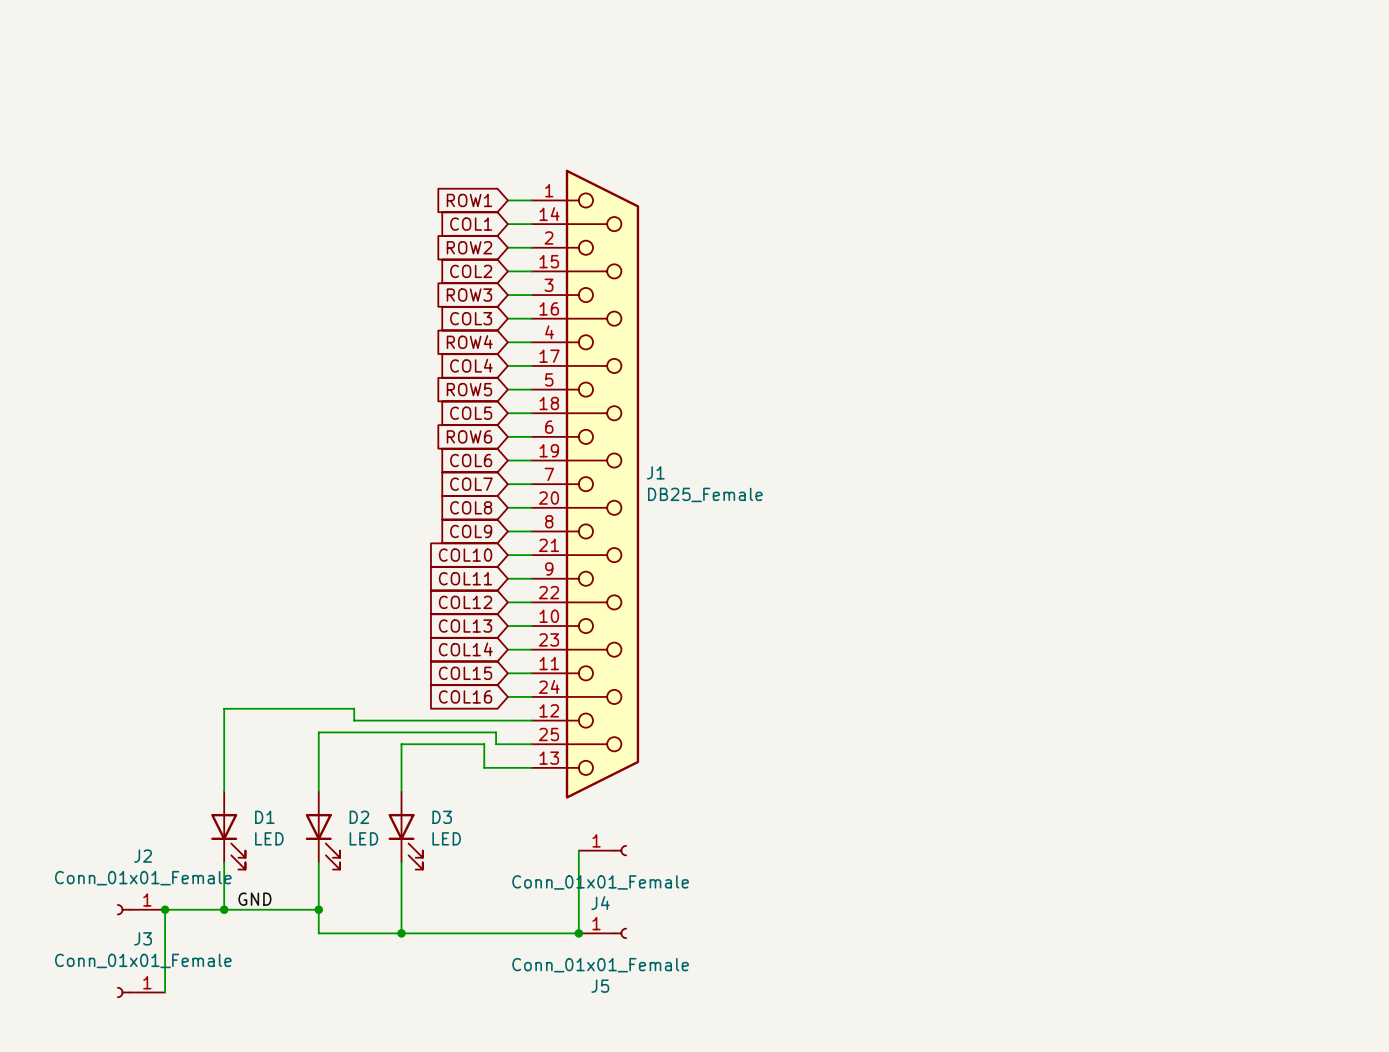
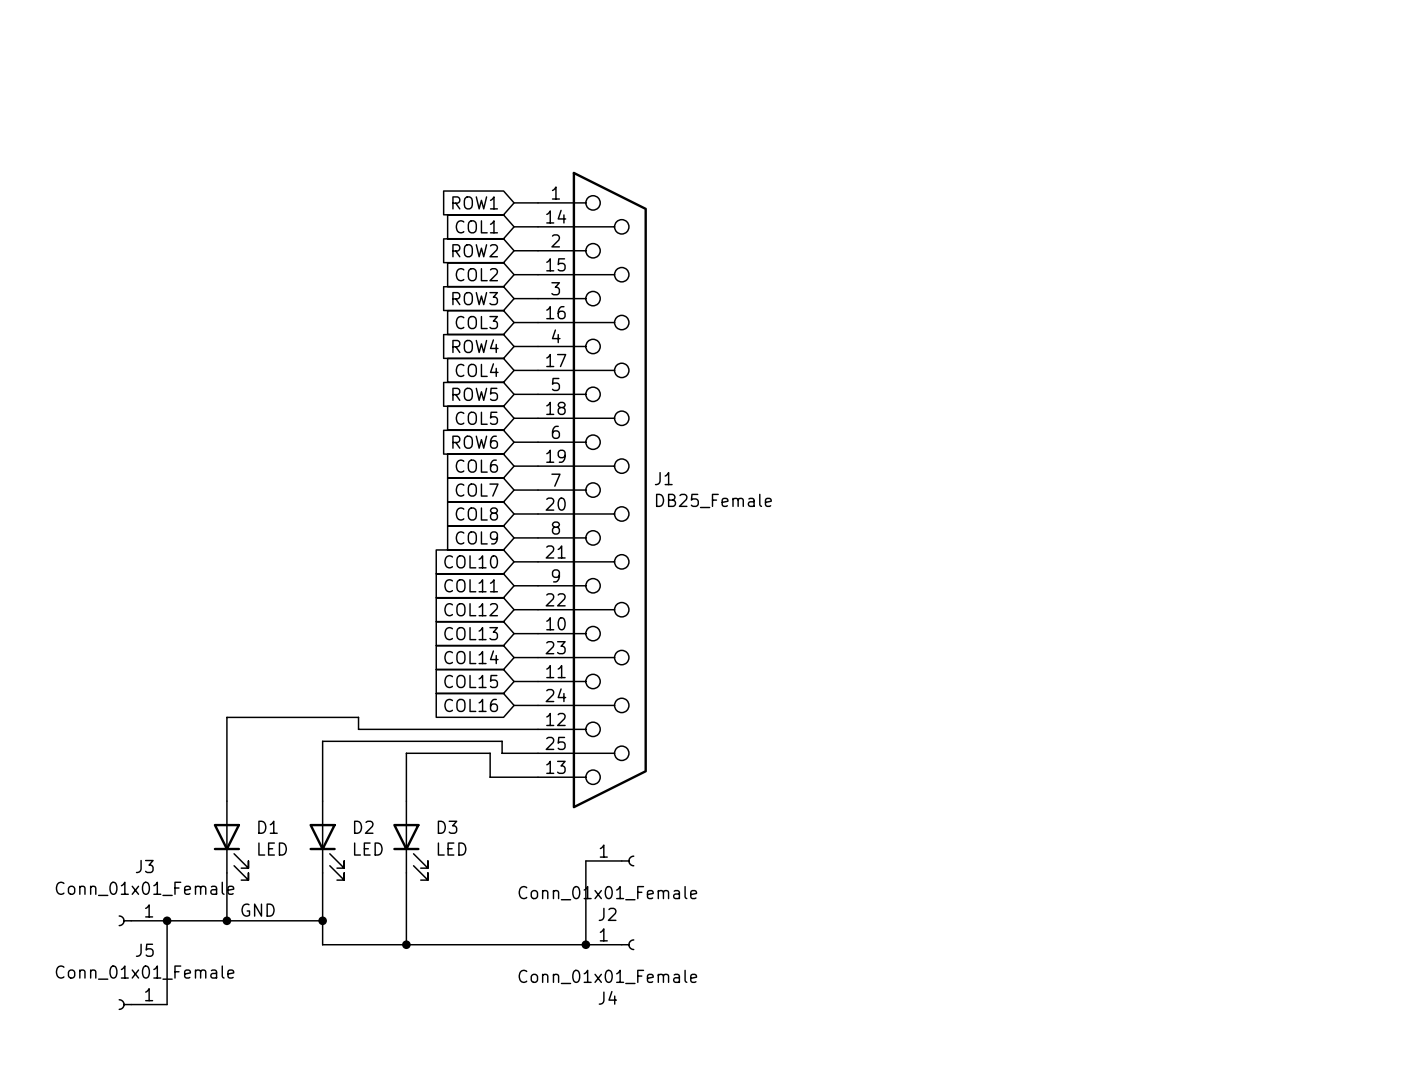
J2 name: J2 (143, 856) -> J3 (144, 866)
J4 name: J4 (600, 903) -> J2 (607, 914)
J3 name: J3 (143, 938) -> J5 (144, 950)
J5 name: J5 (600, 986) -> J4 (607, 997)

